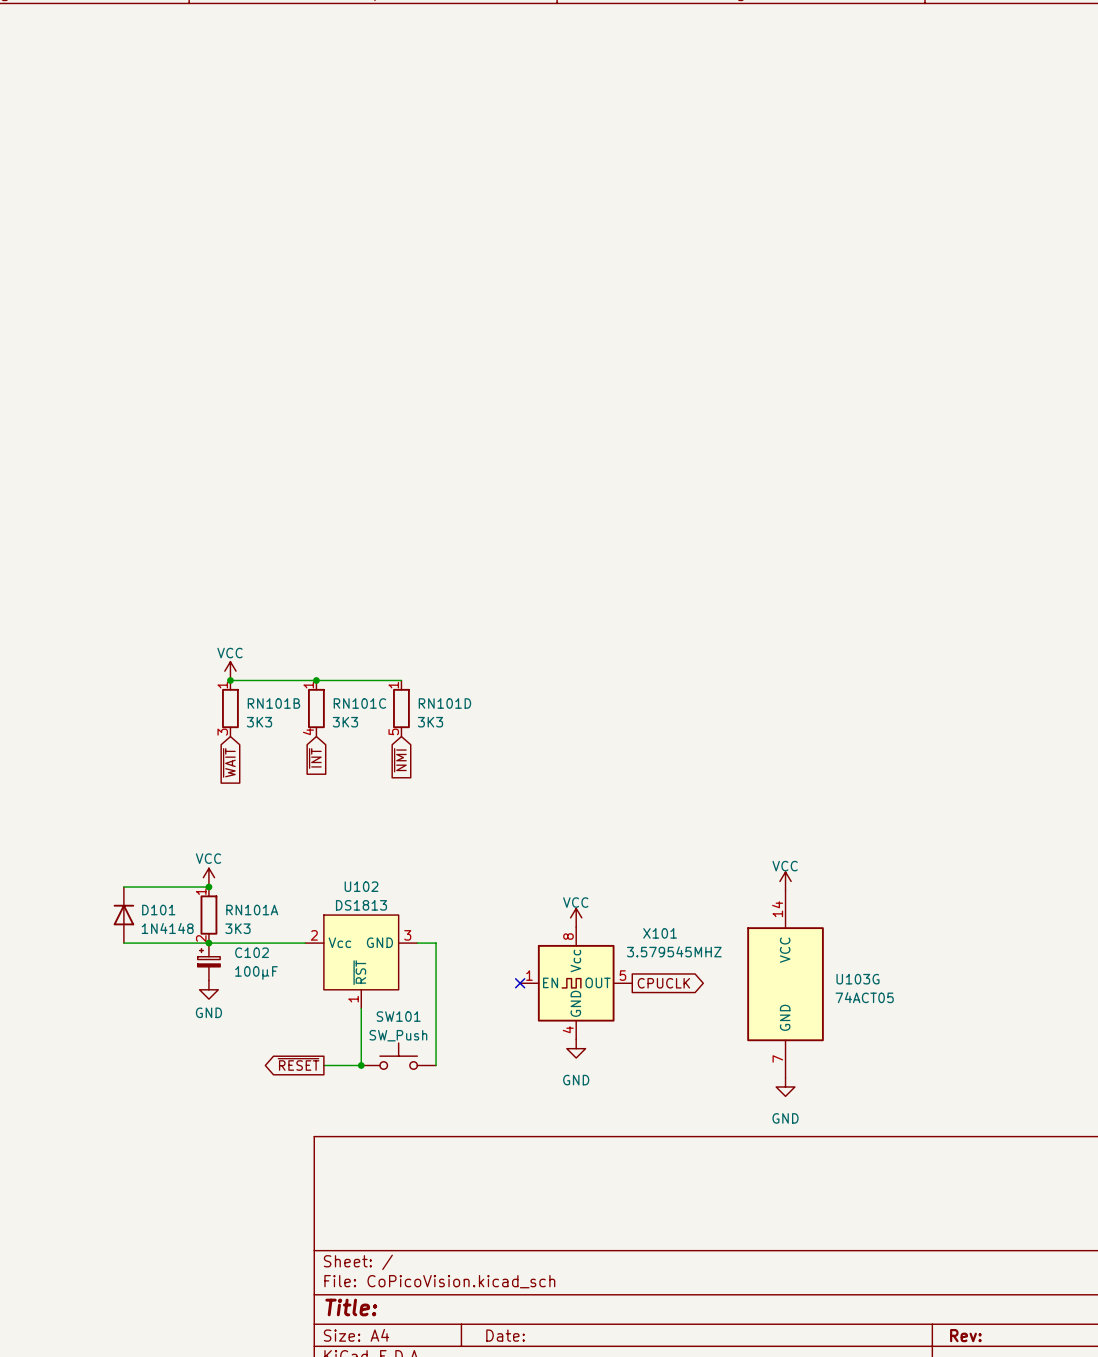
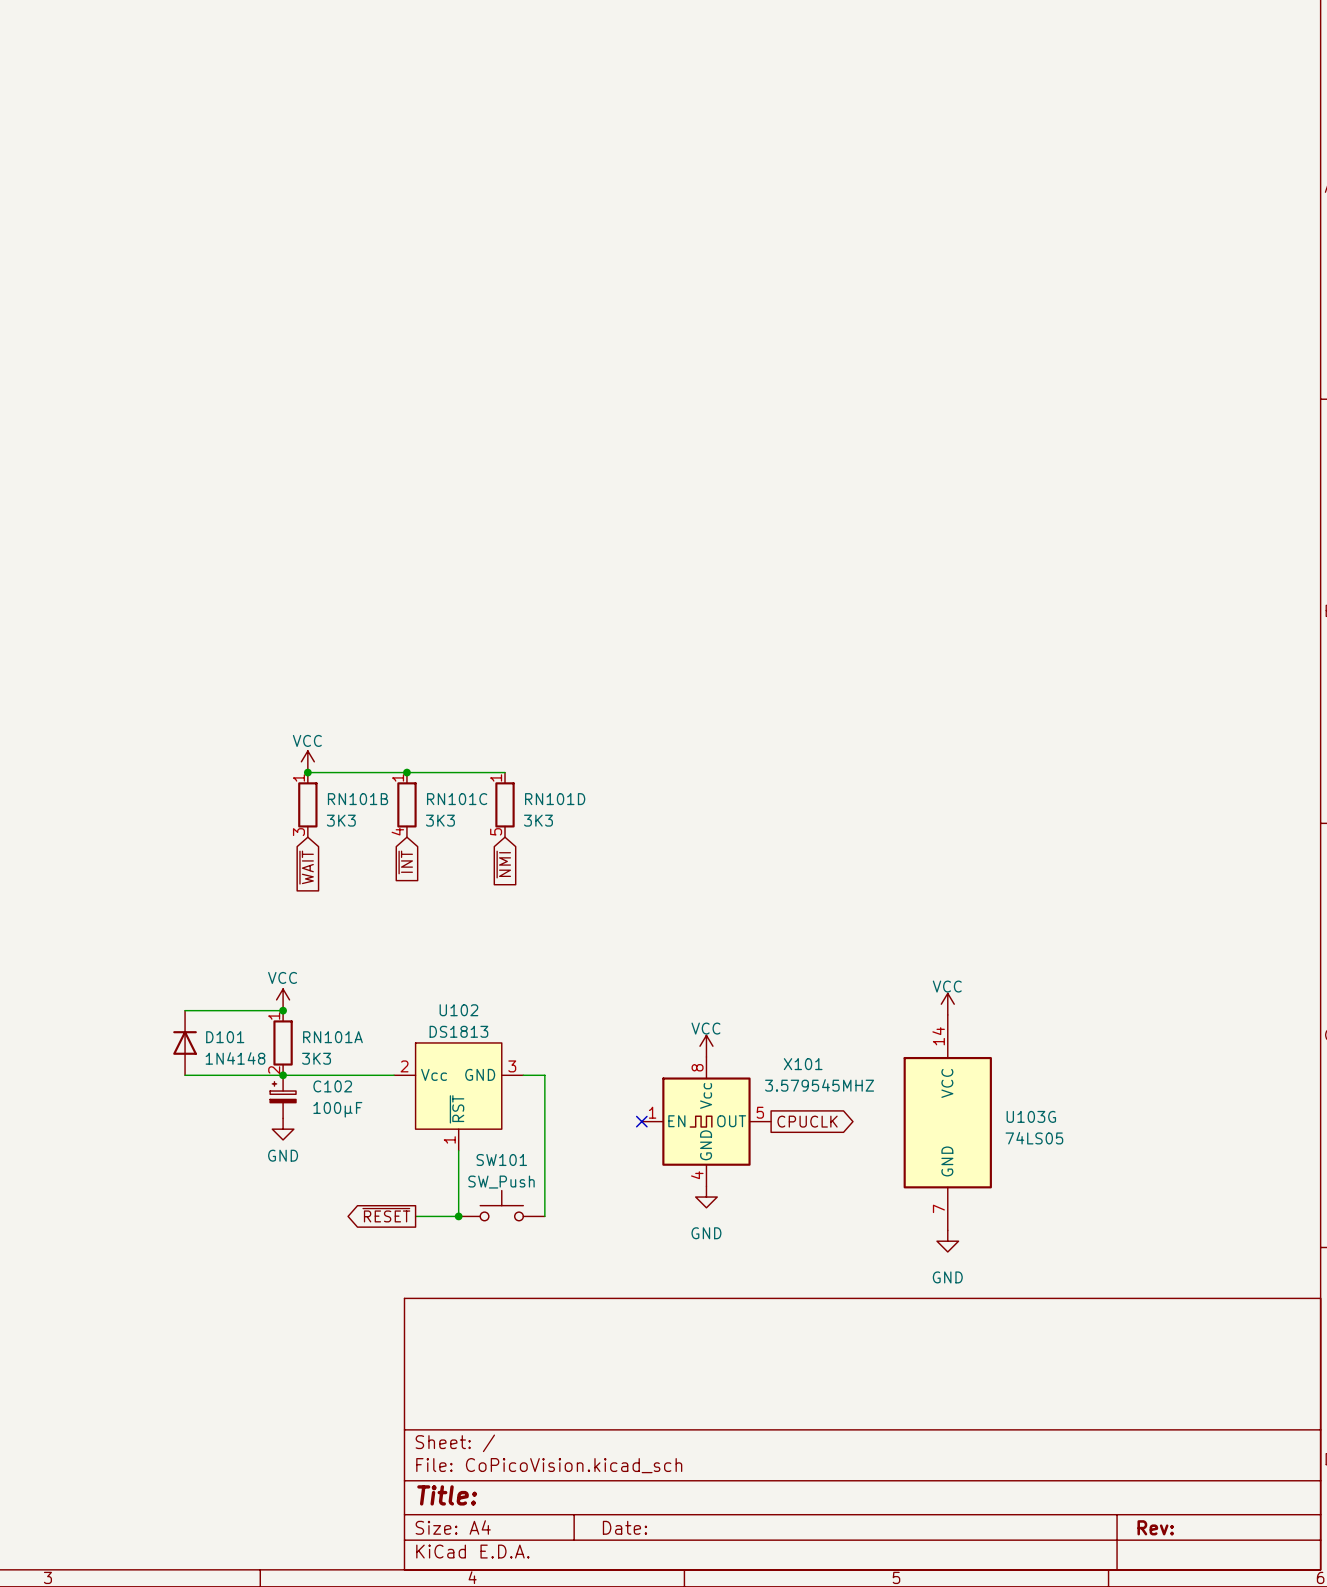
U103G value: 74ACT05 (864, 997) -> 74LS05 (1034, 1138)

